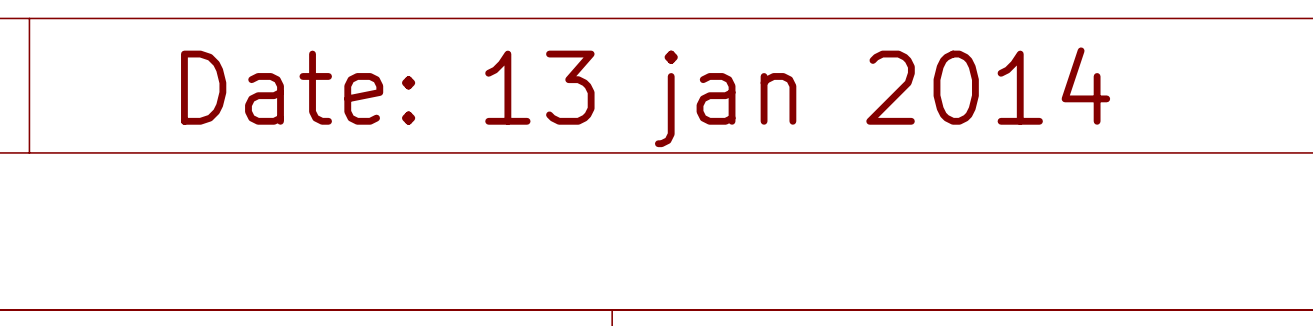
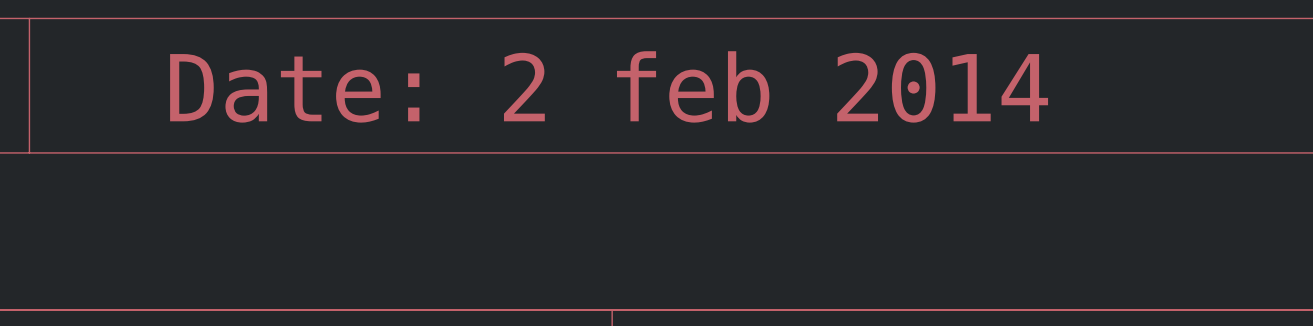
title block: Date: 13 jan 2014 (645, 97) -> Date: 2 feb 2014 (609, 86)

